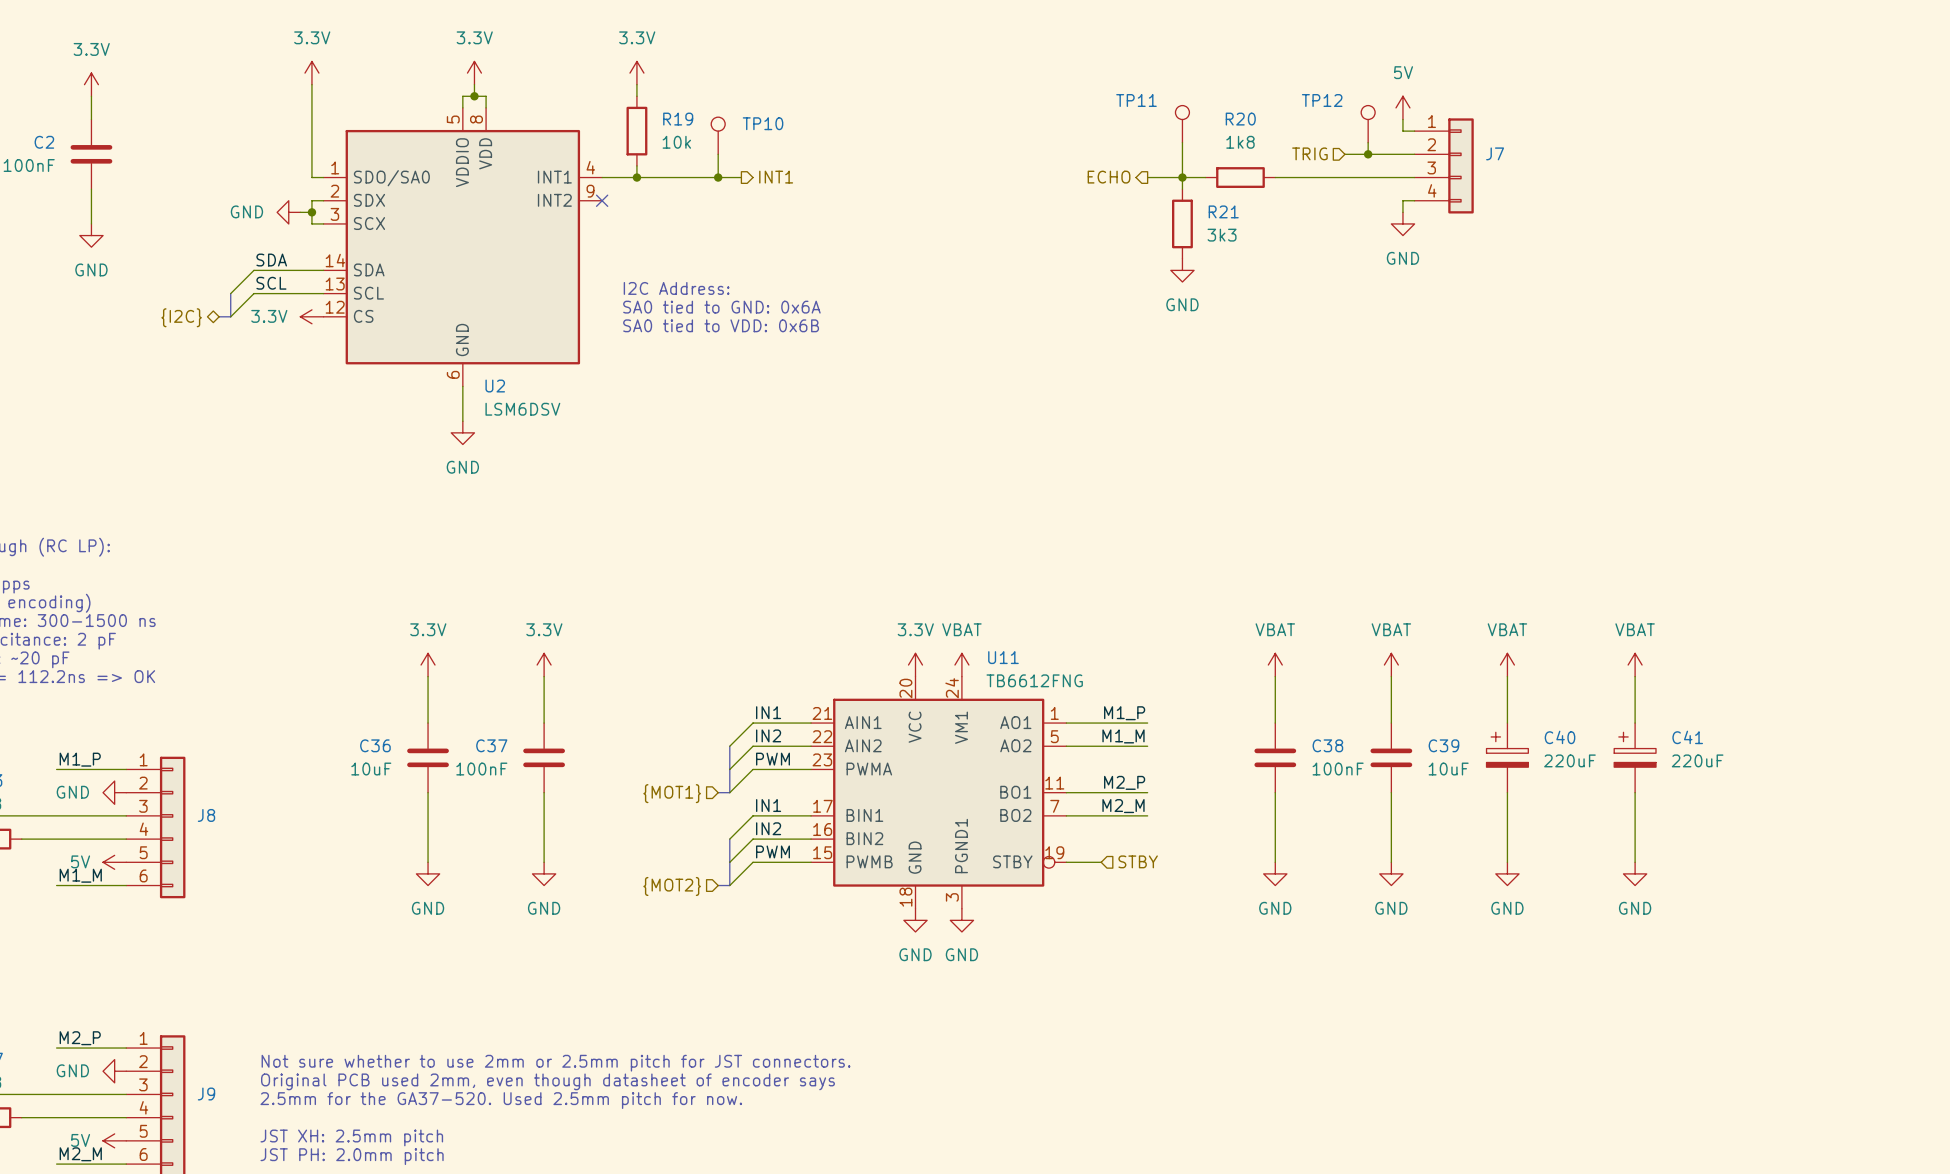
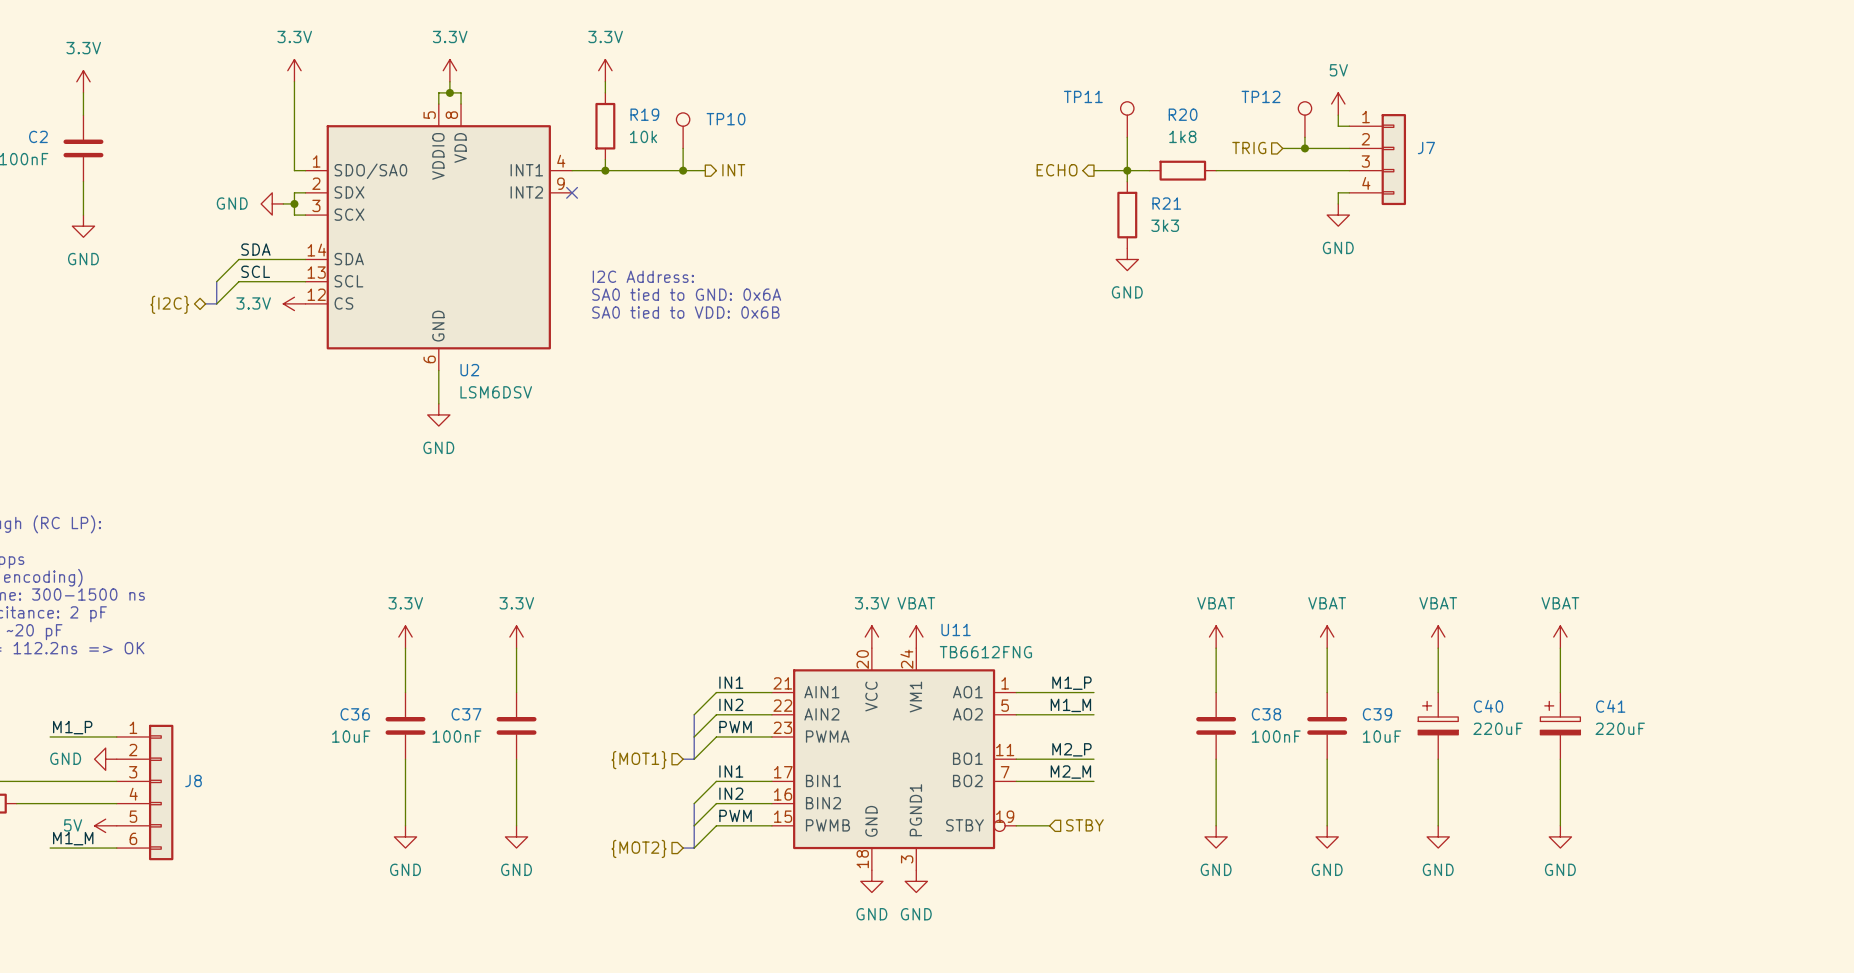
hierarchical label: INT1 (776, 177) -> INT (733, 170)

